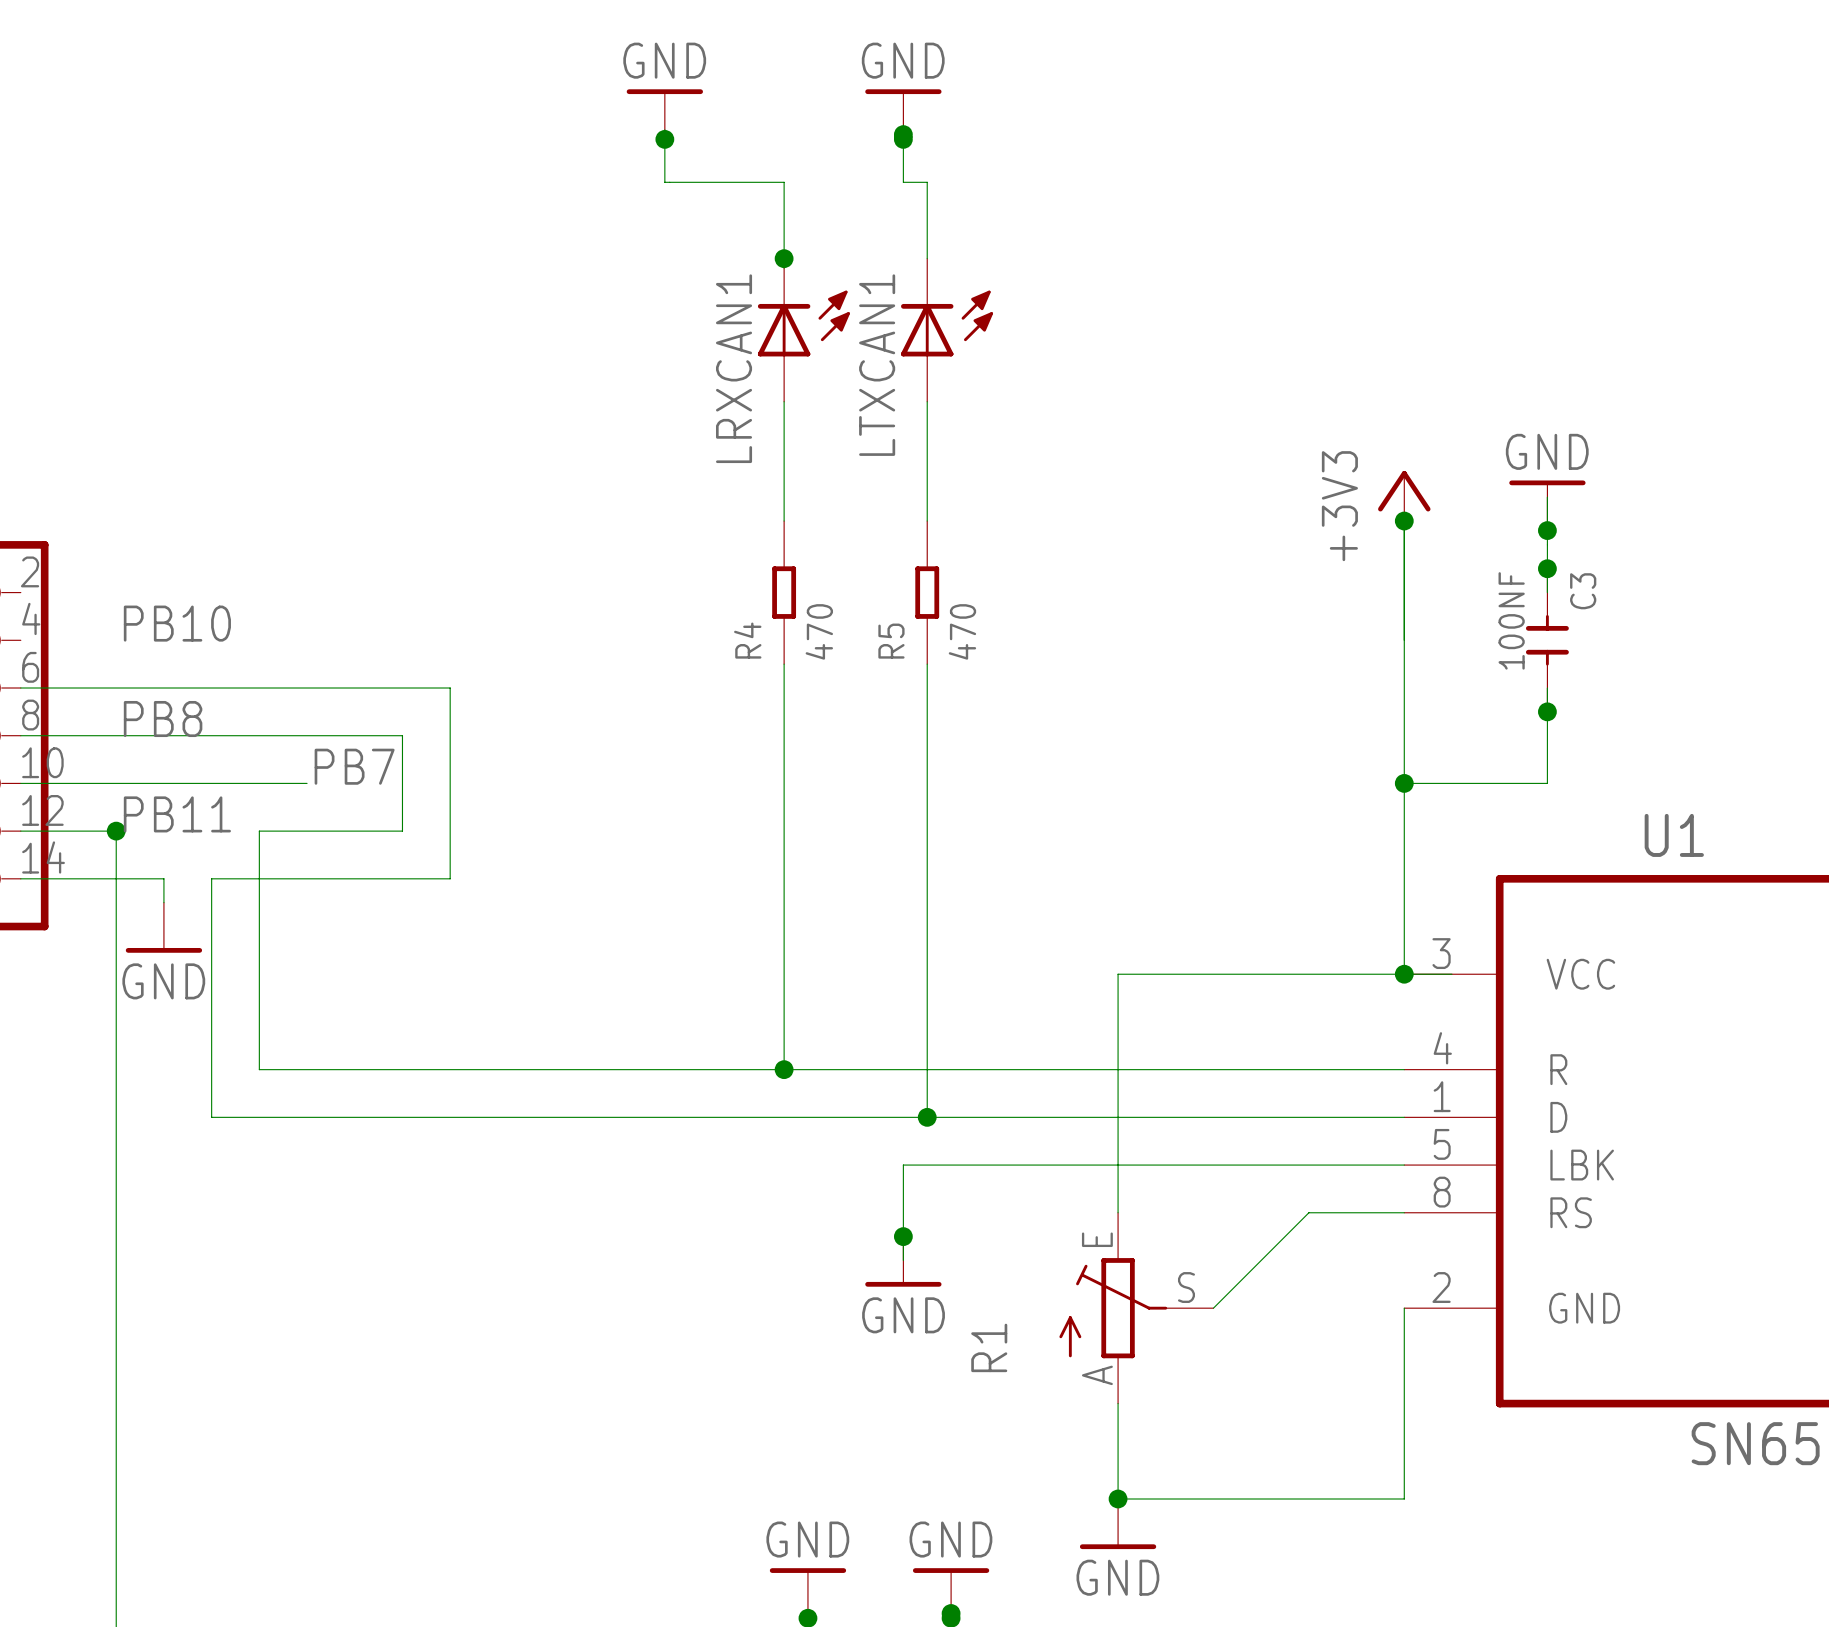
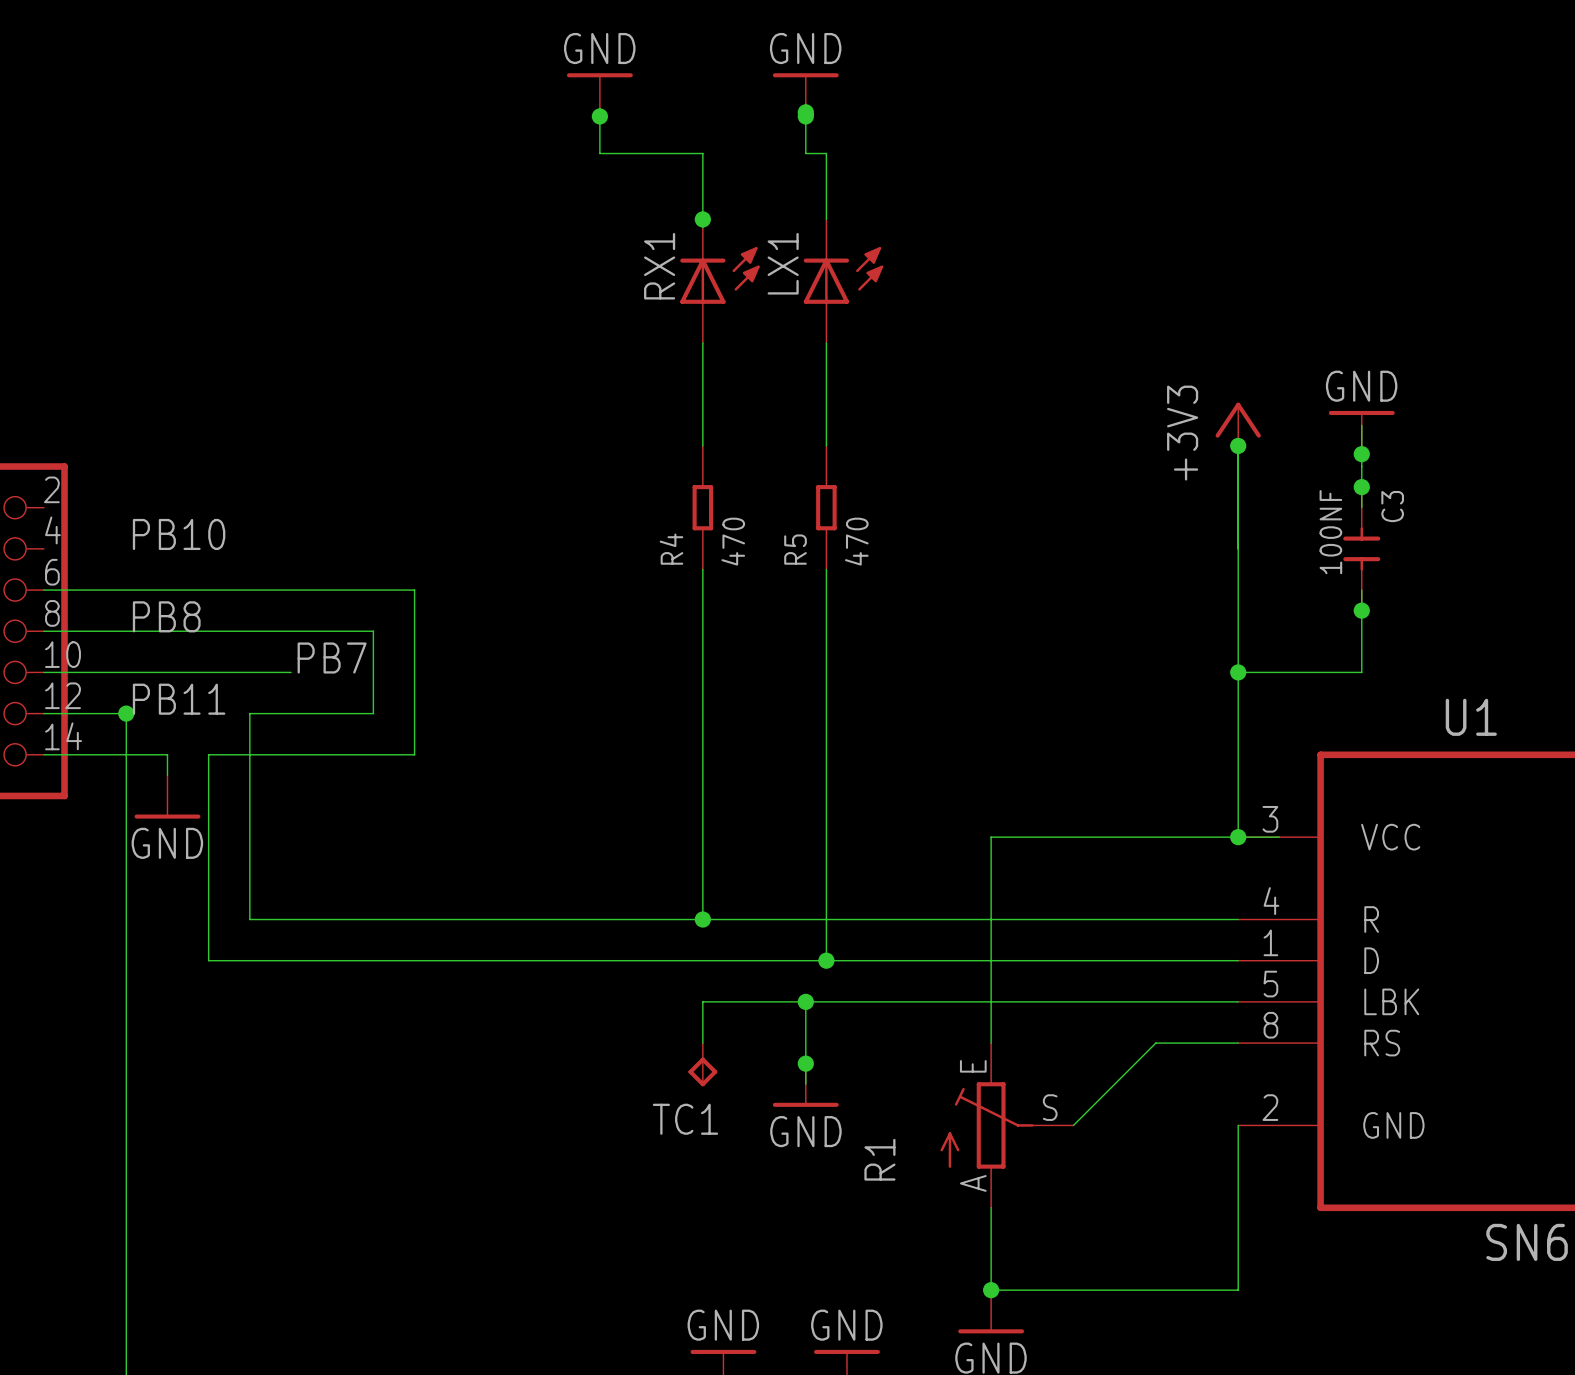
LTXCAN1 name: LTXCAN1 (877, 365) -> LX1 (783, 263)
LRXCAN1 name: LRXCAN1 (734, 368) -> RX1 (659, 266)
wire: none -> (805, 1001) (702, 1001) (702, 1043)
junction: none -> (805, 1001)
TC1: none -> (702, 1064)

